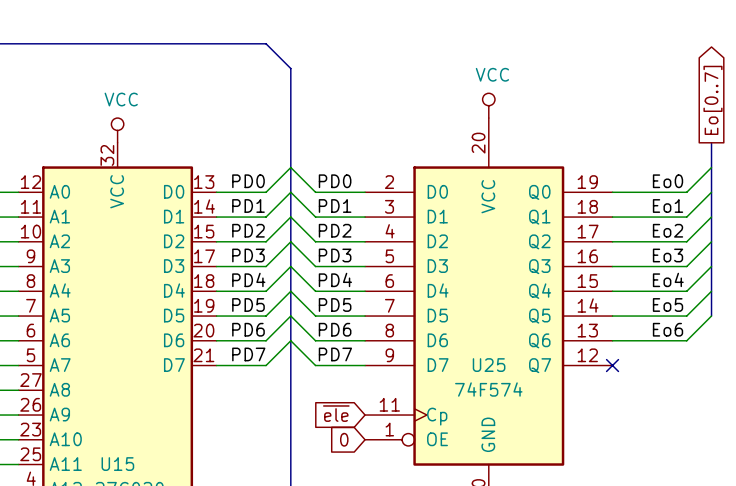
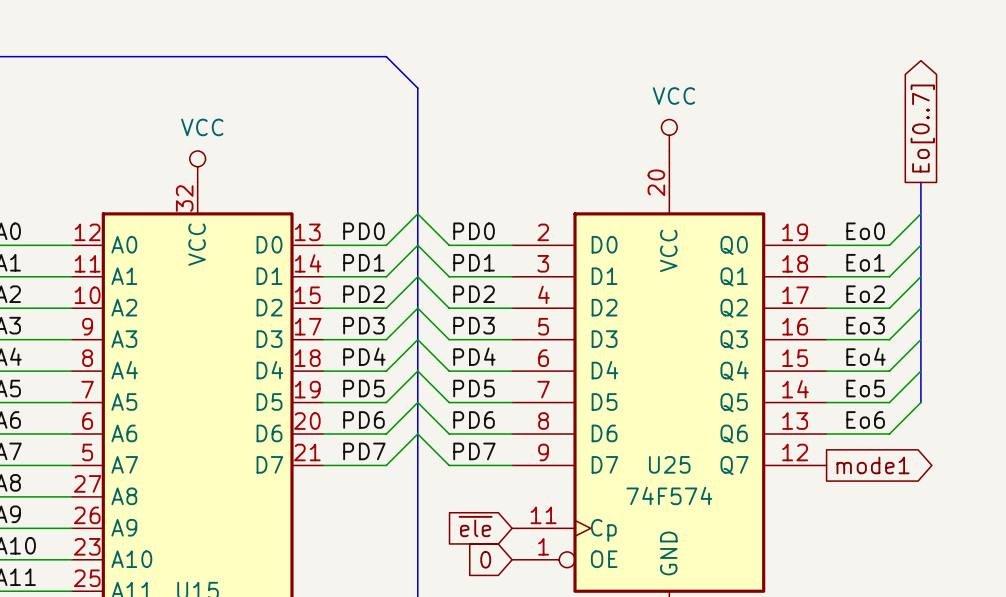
global label position: Eo[0..7] (712, 100) -> Eo[0..7] (922, 128)
bus: (711, 142) (711, 316) -> (920, 182) (920, 402)
wire: (711, 167) (686, 192) (662, 192) -> (920, 213) (889, 245)
label position: Eo0 (668, 181) -> Eo0 (865, 231)
wire: (711, 192) (686, 217) (662, 217) -> (920, 245) (889, 276)
label position: Eo1 (668, 206) -> Eo1 (865, 262)
wire: (711, 217) (686, 241) (662, 241) -> (920, 276) (889, 308)
label position: Eo2 (668, 230) -> Eo2 (865, 294)
wire: (711, 241) (686, 266) (662, 266) -> (920, 308) (889, 339)
label position: Eo3 (668, 255) -> Eo3 (865, 325)
wire: (711, 266) (686, 291) (662, 291) -> (920, 339) (889, 371)
label position: Eo4 (668, 279) -> Eo4 (866, 356)
wire: (711, 291) (686, 316) (662, 316) -> (920, 371) (889, 402)
label position: Eo5 (668, 304) -> Eo5 (865, 388)
wire: (711, 316) (686, 340) (662, 340) -> (920, 402) (889, 434)
label position: Eo6 (668, 329) -> Eo6 (865, 419)
no-connect mark: (612, 365) -> none
global label: none -> mode1 (873, 465)

